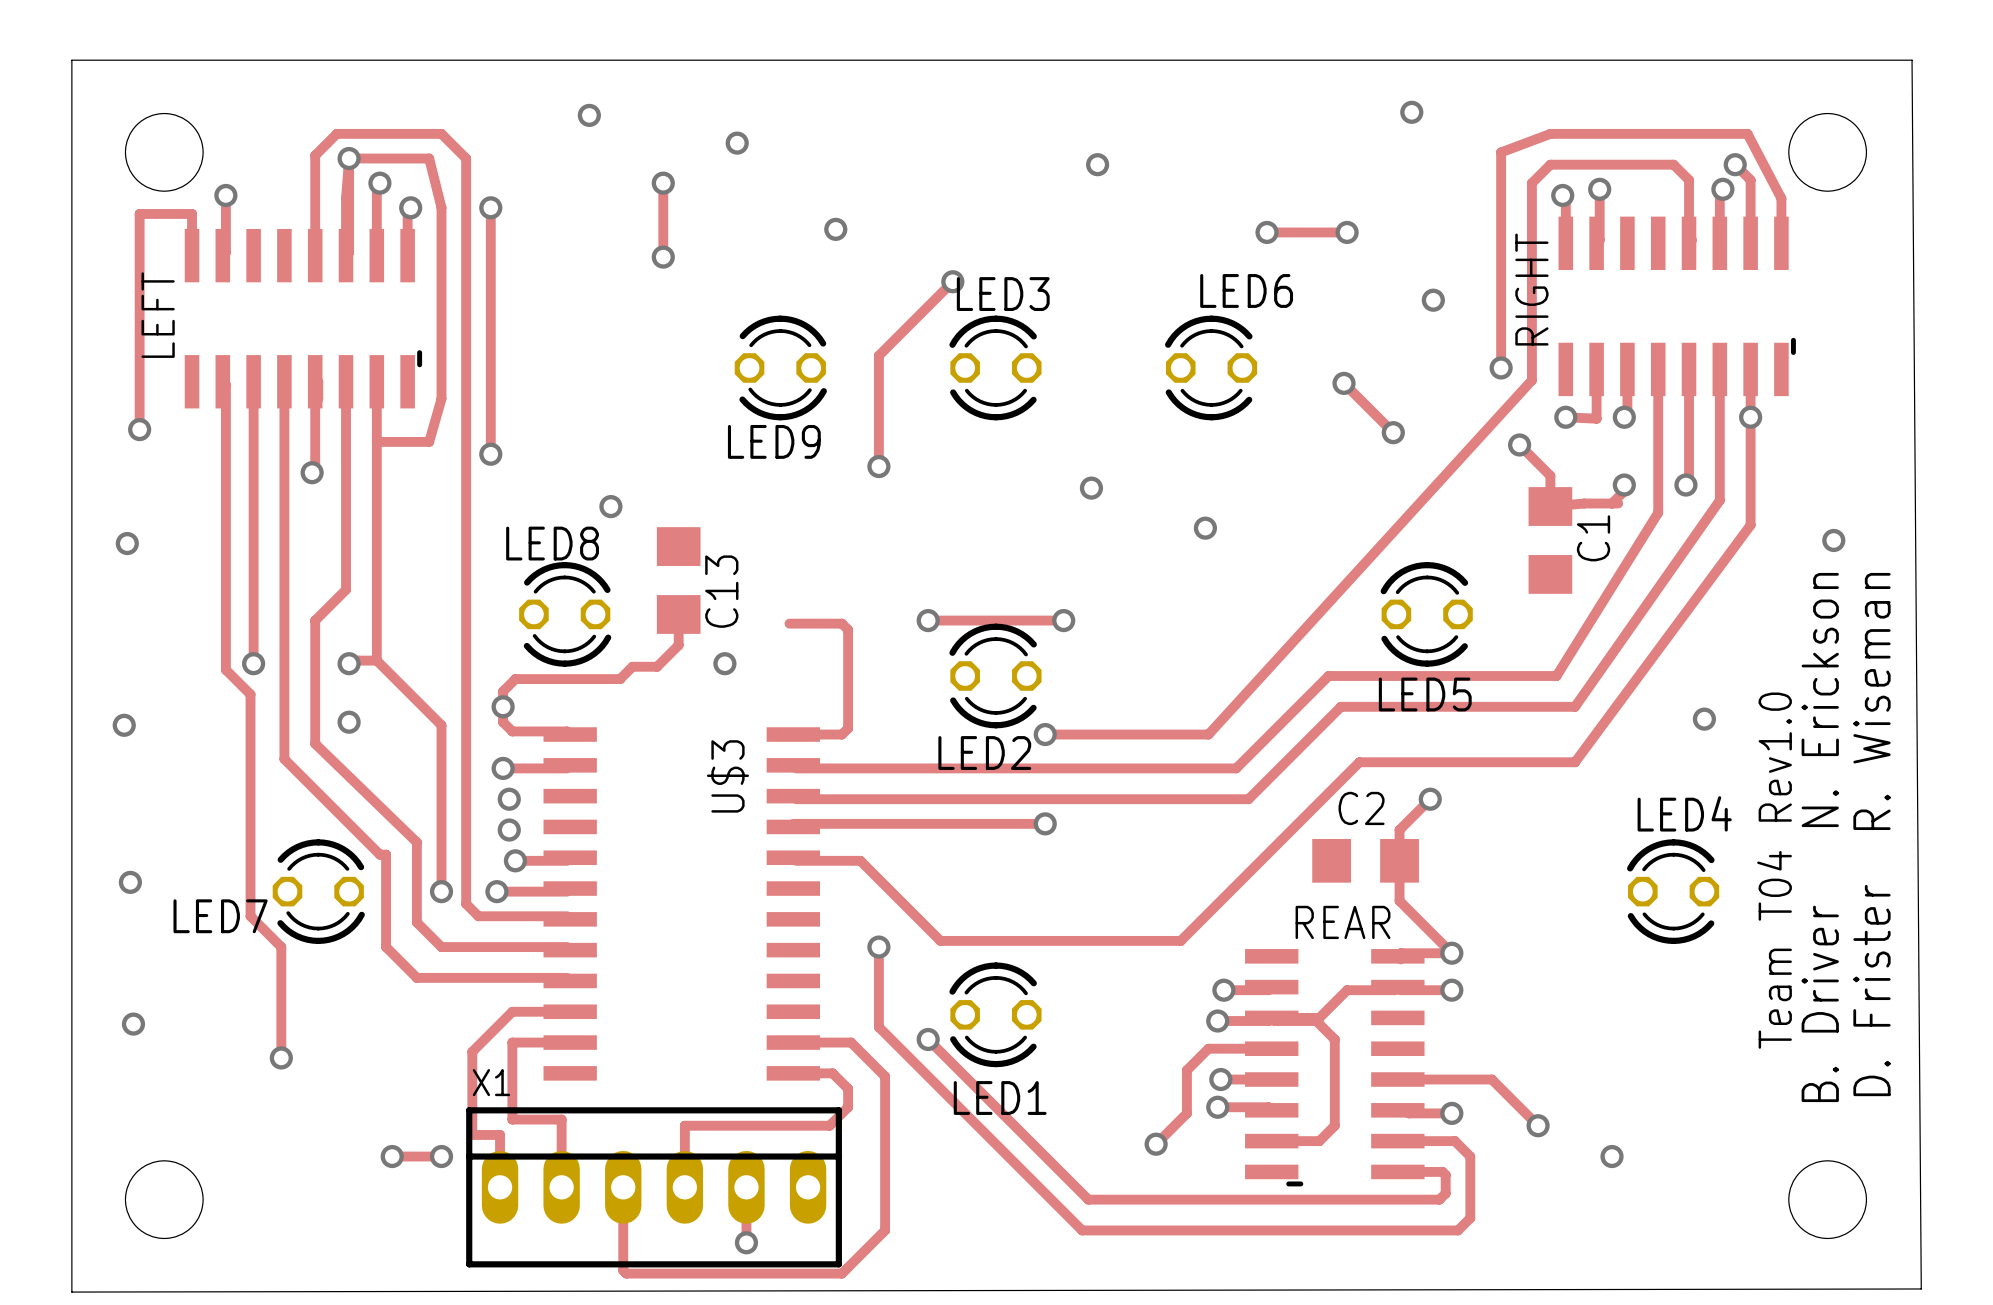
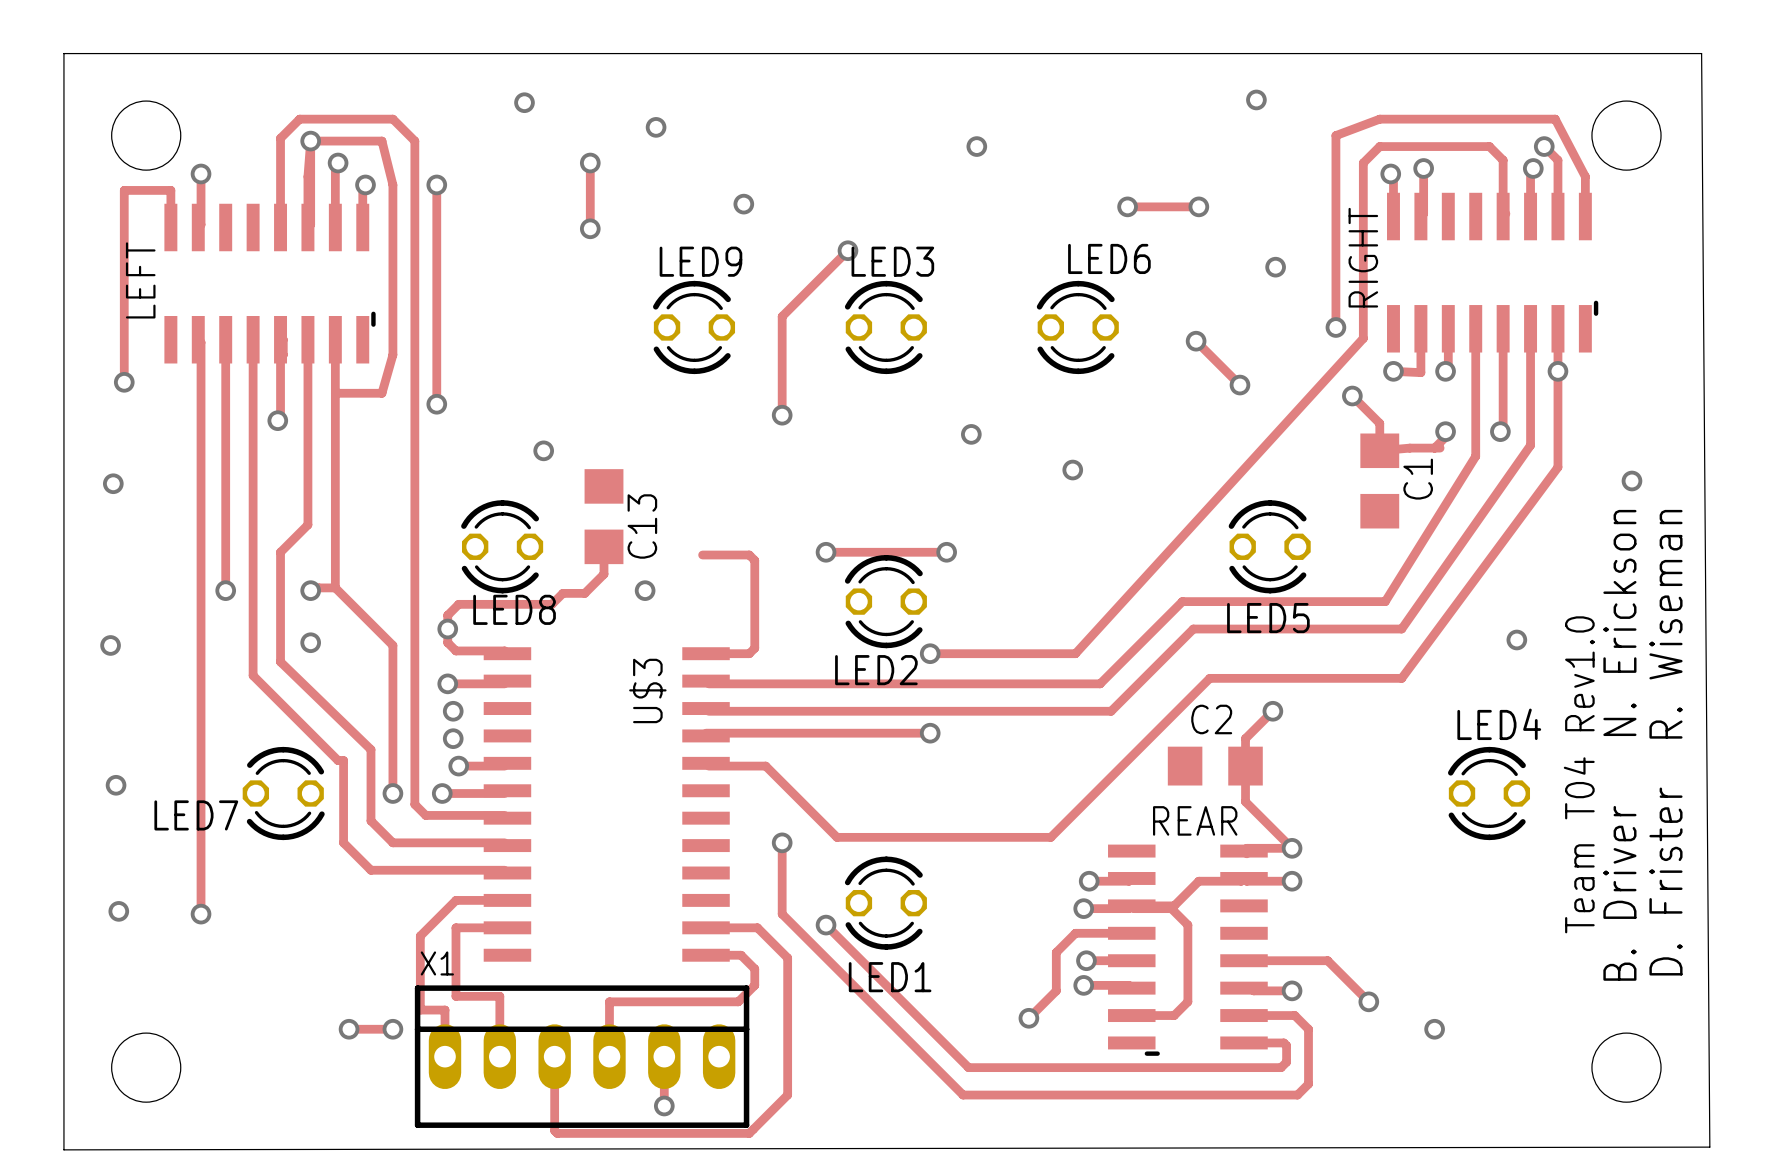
LED9 rotation: 0° (780, 367) -> 180° (694, 327)
LED8 rotation: 0° (565, 614) -> 180° (502, 546)
track: (225, 669) (250, 694) (250, 916) (281, 947) (281, 1057) -> (201, 596) (201, 914)
via position: (281, 1057) -> (201, 914)

